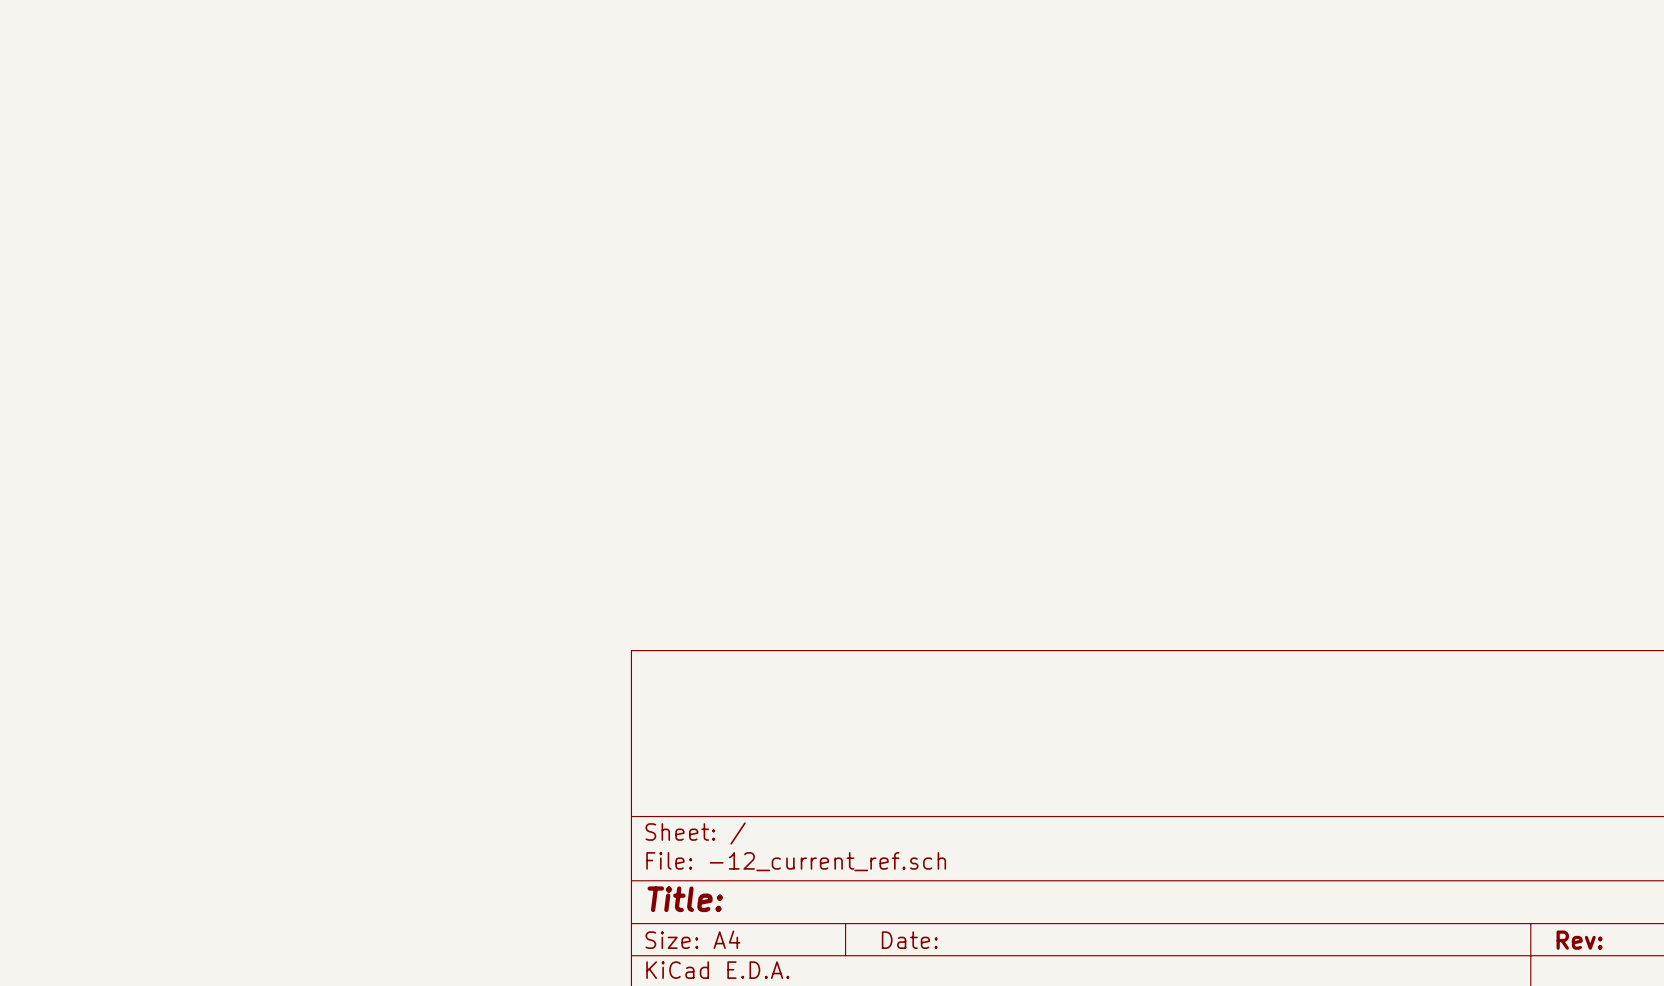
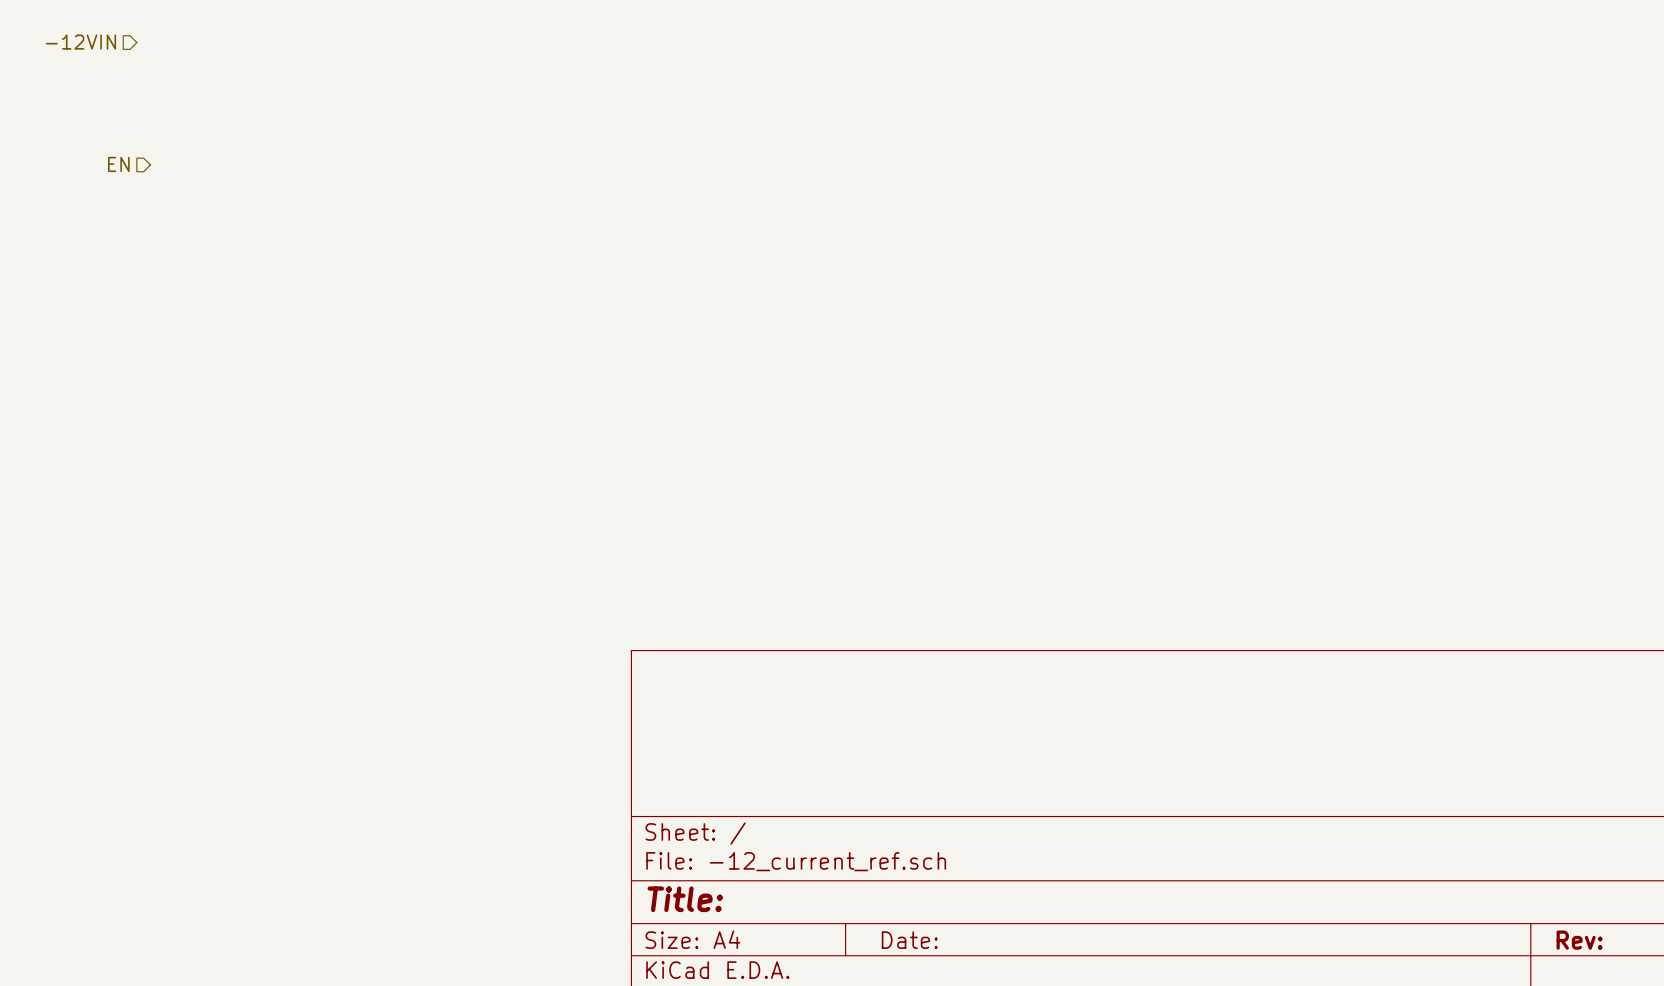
hierarchical label: none -> -12VIN (80, 42)
hierarchical label: none -> EN (118, 164)

